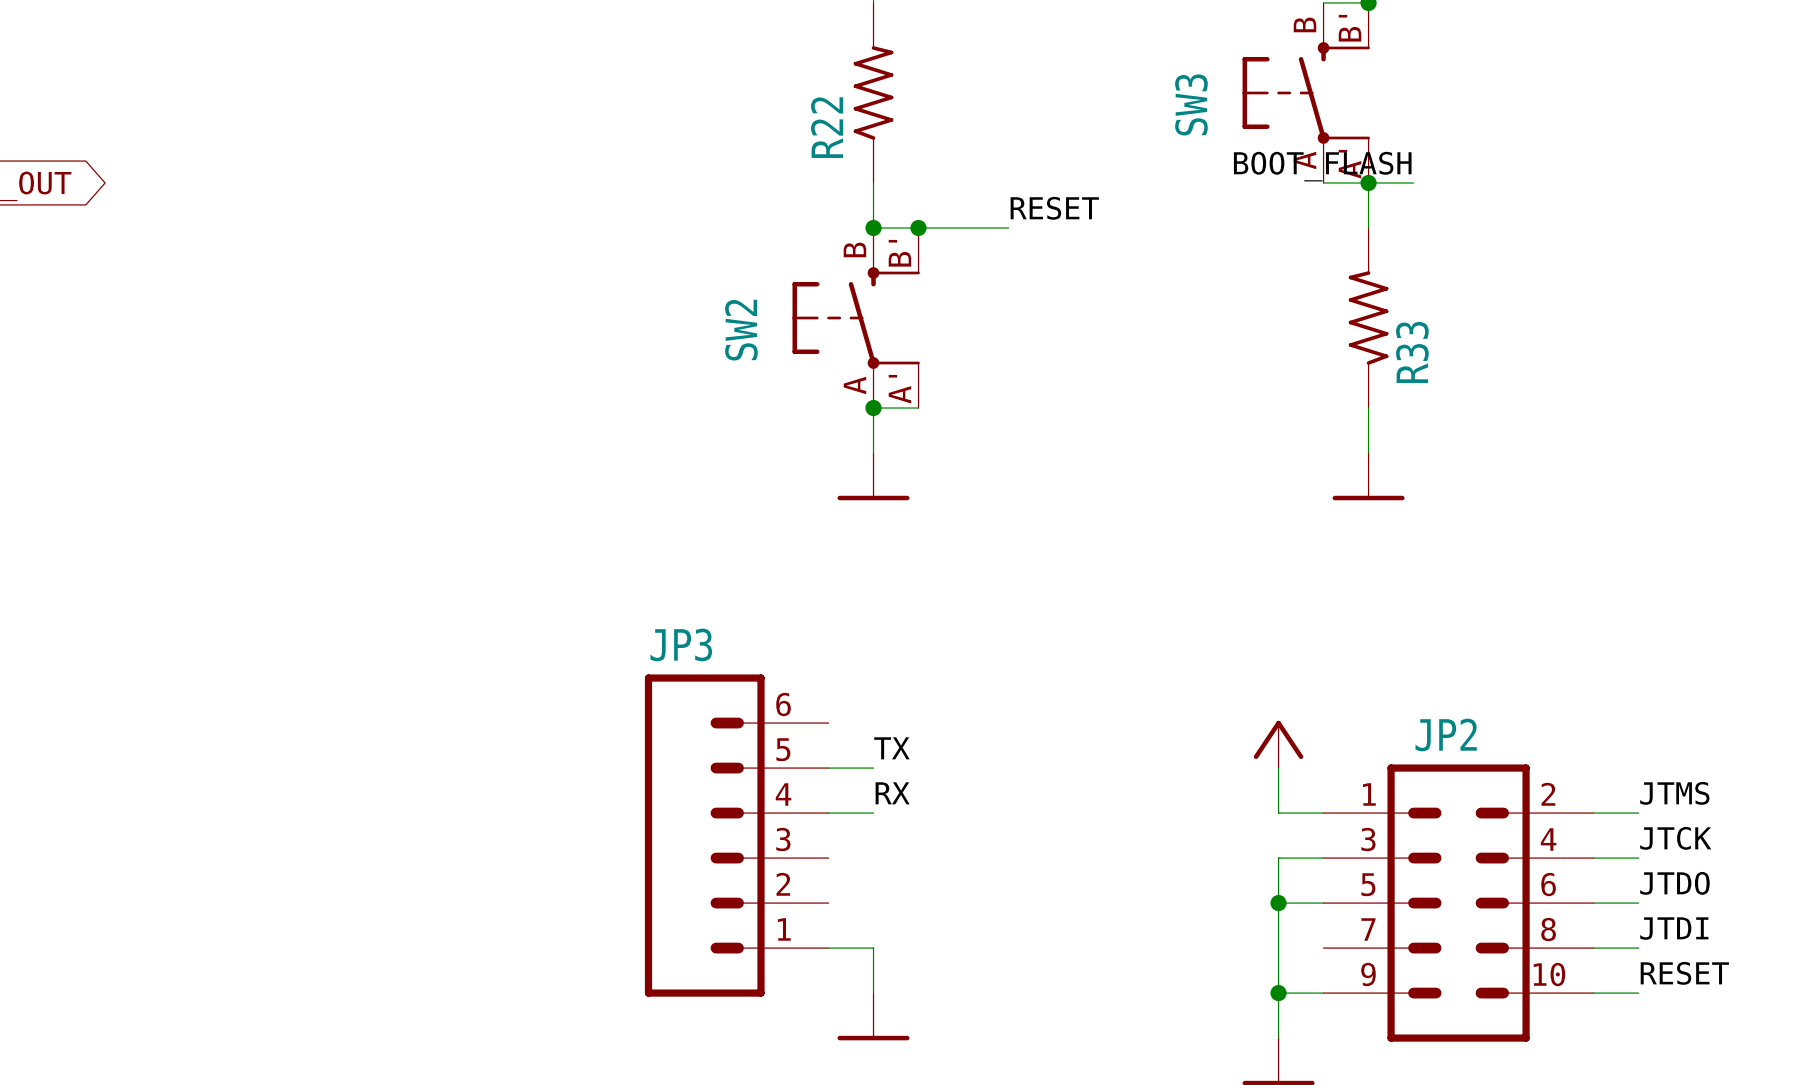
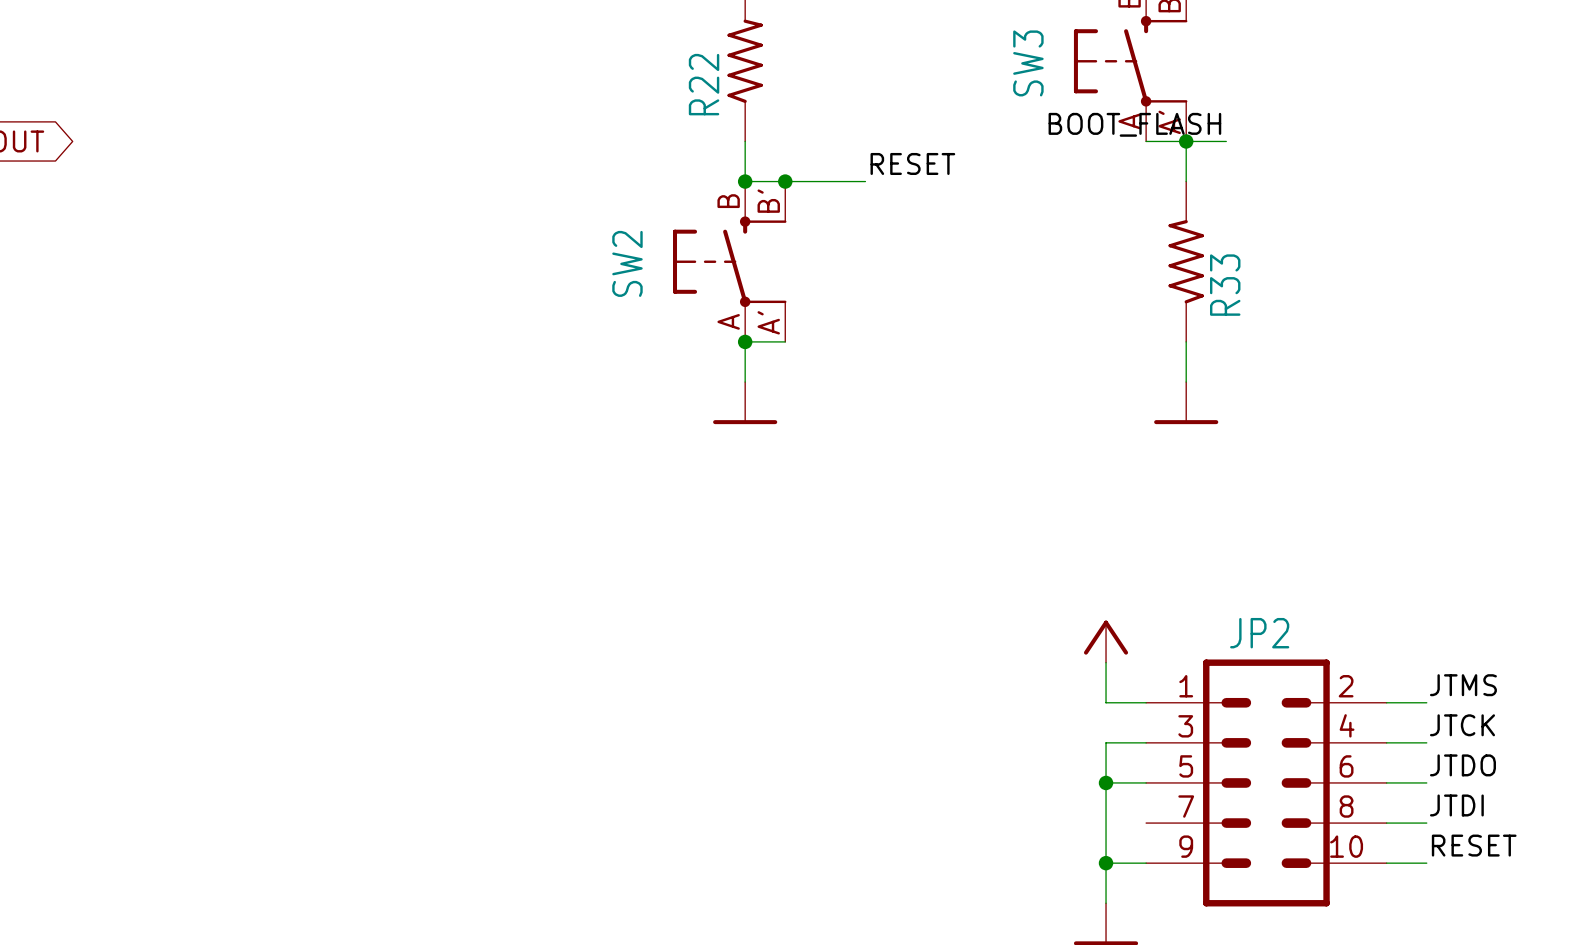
label: TX (891, 748) -> none
wire: (828, 768) (873, 768) -> none
label: RX (892, 793) -> none
wire: (828, 813) (873, 813) -> none
JP3: (736, 835) -> none
wire: (828, 948) (873, 948) (873, 993) -> none
power symbol: (873, 1016) -> none

